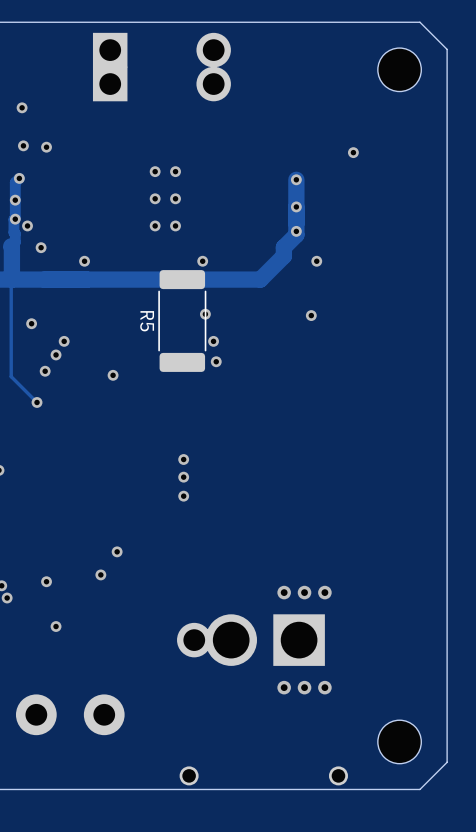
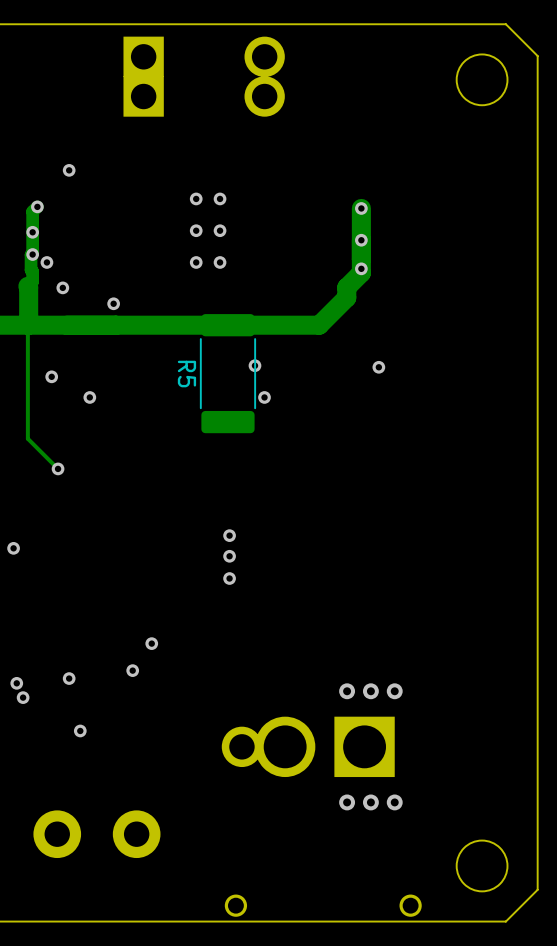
via: (22, 107) -> none
via: (23, 145) -> none
via: (353, 152) -> none
via: (202, 261) -> none
via: (316, 261) -> none
via: (56, 354) -> none
via: (216, 361) -> none
via: (45, 371) -> none
via: (113, 375) -> none

